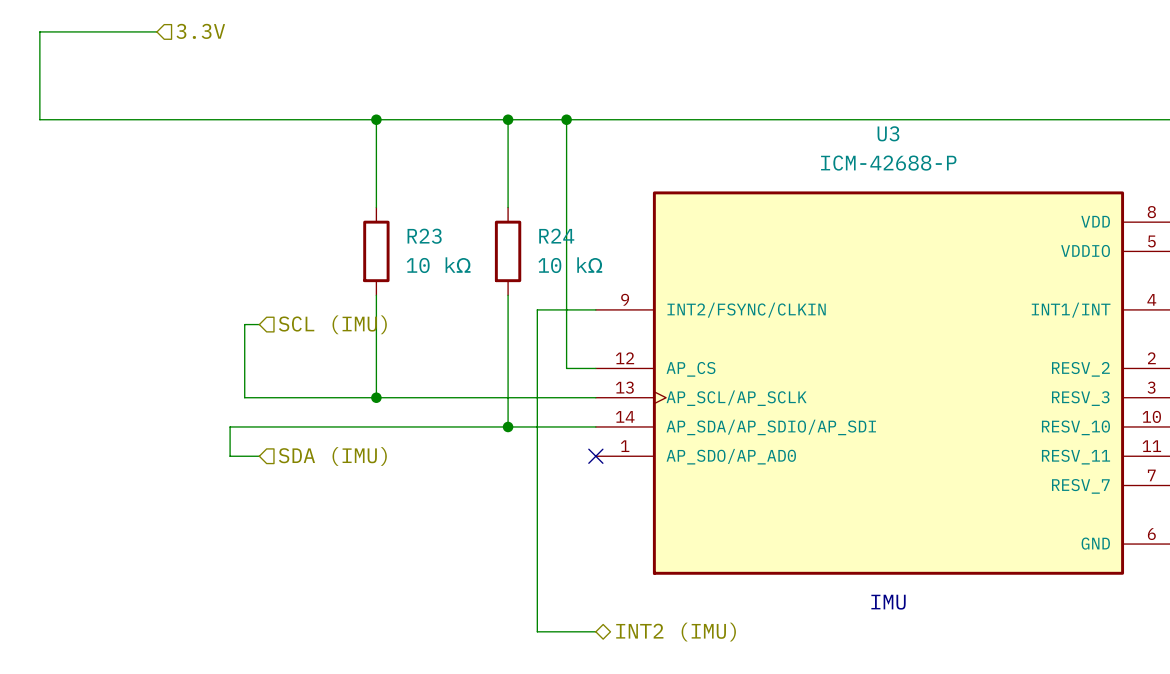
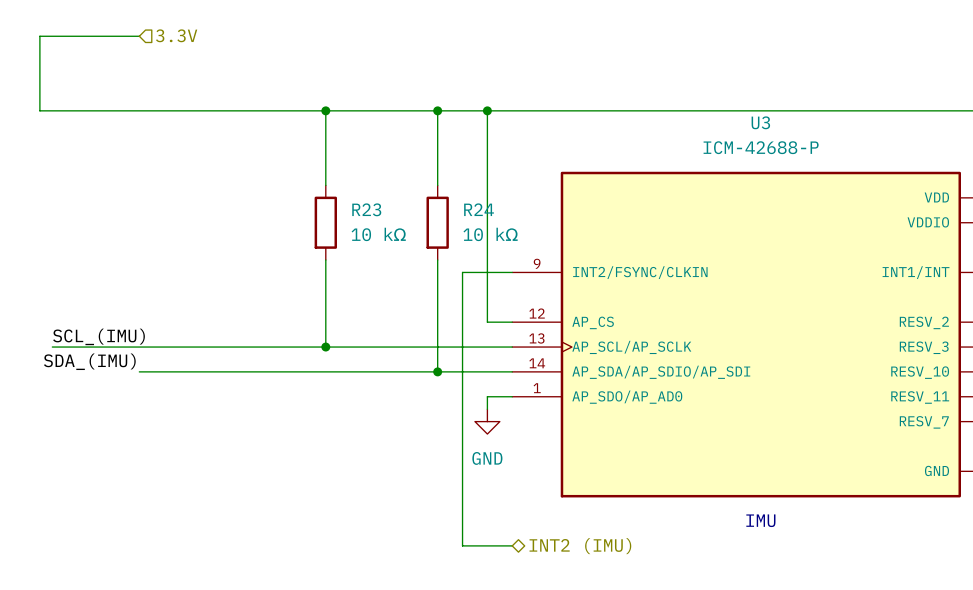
wire: (259, 324) (244, 324) (244, 397) -> (52, 347) (213, 347)
hierarchical label: SCL (IMU) (332, 324) -> none
label: none -> SCL_(IMU) (98, 336)
label: none -> SDA_(IMU) (89, 361)
wire: (230, 426) (230, 456) (259, 456) -> (201, 371) (139, 371)
hierarchical label: SDA (IMU) (332, 456) -> none
wire: none -> (512, 396) (487, 396) (487, 409)
no-connect mark: (595, 456) -> none
power symbol: none -> GND (487, 421)

